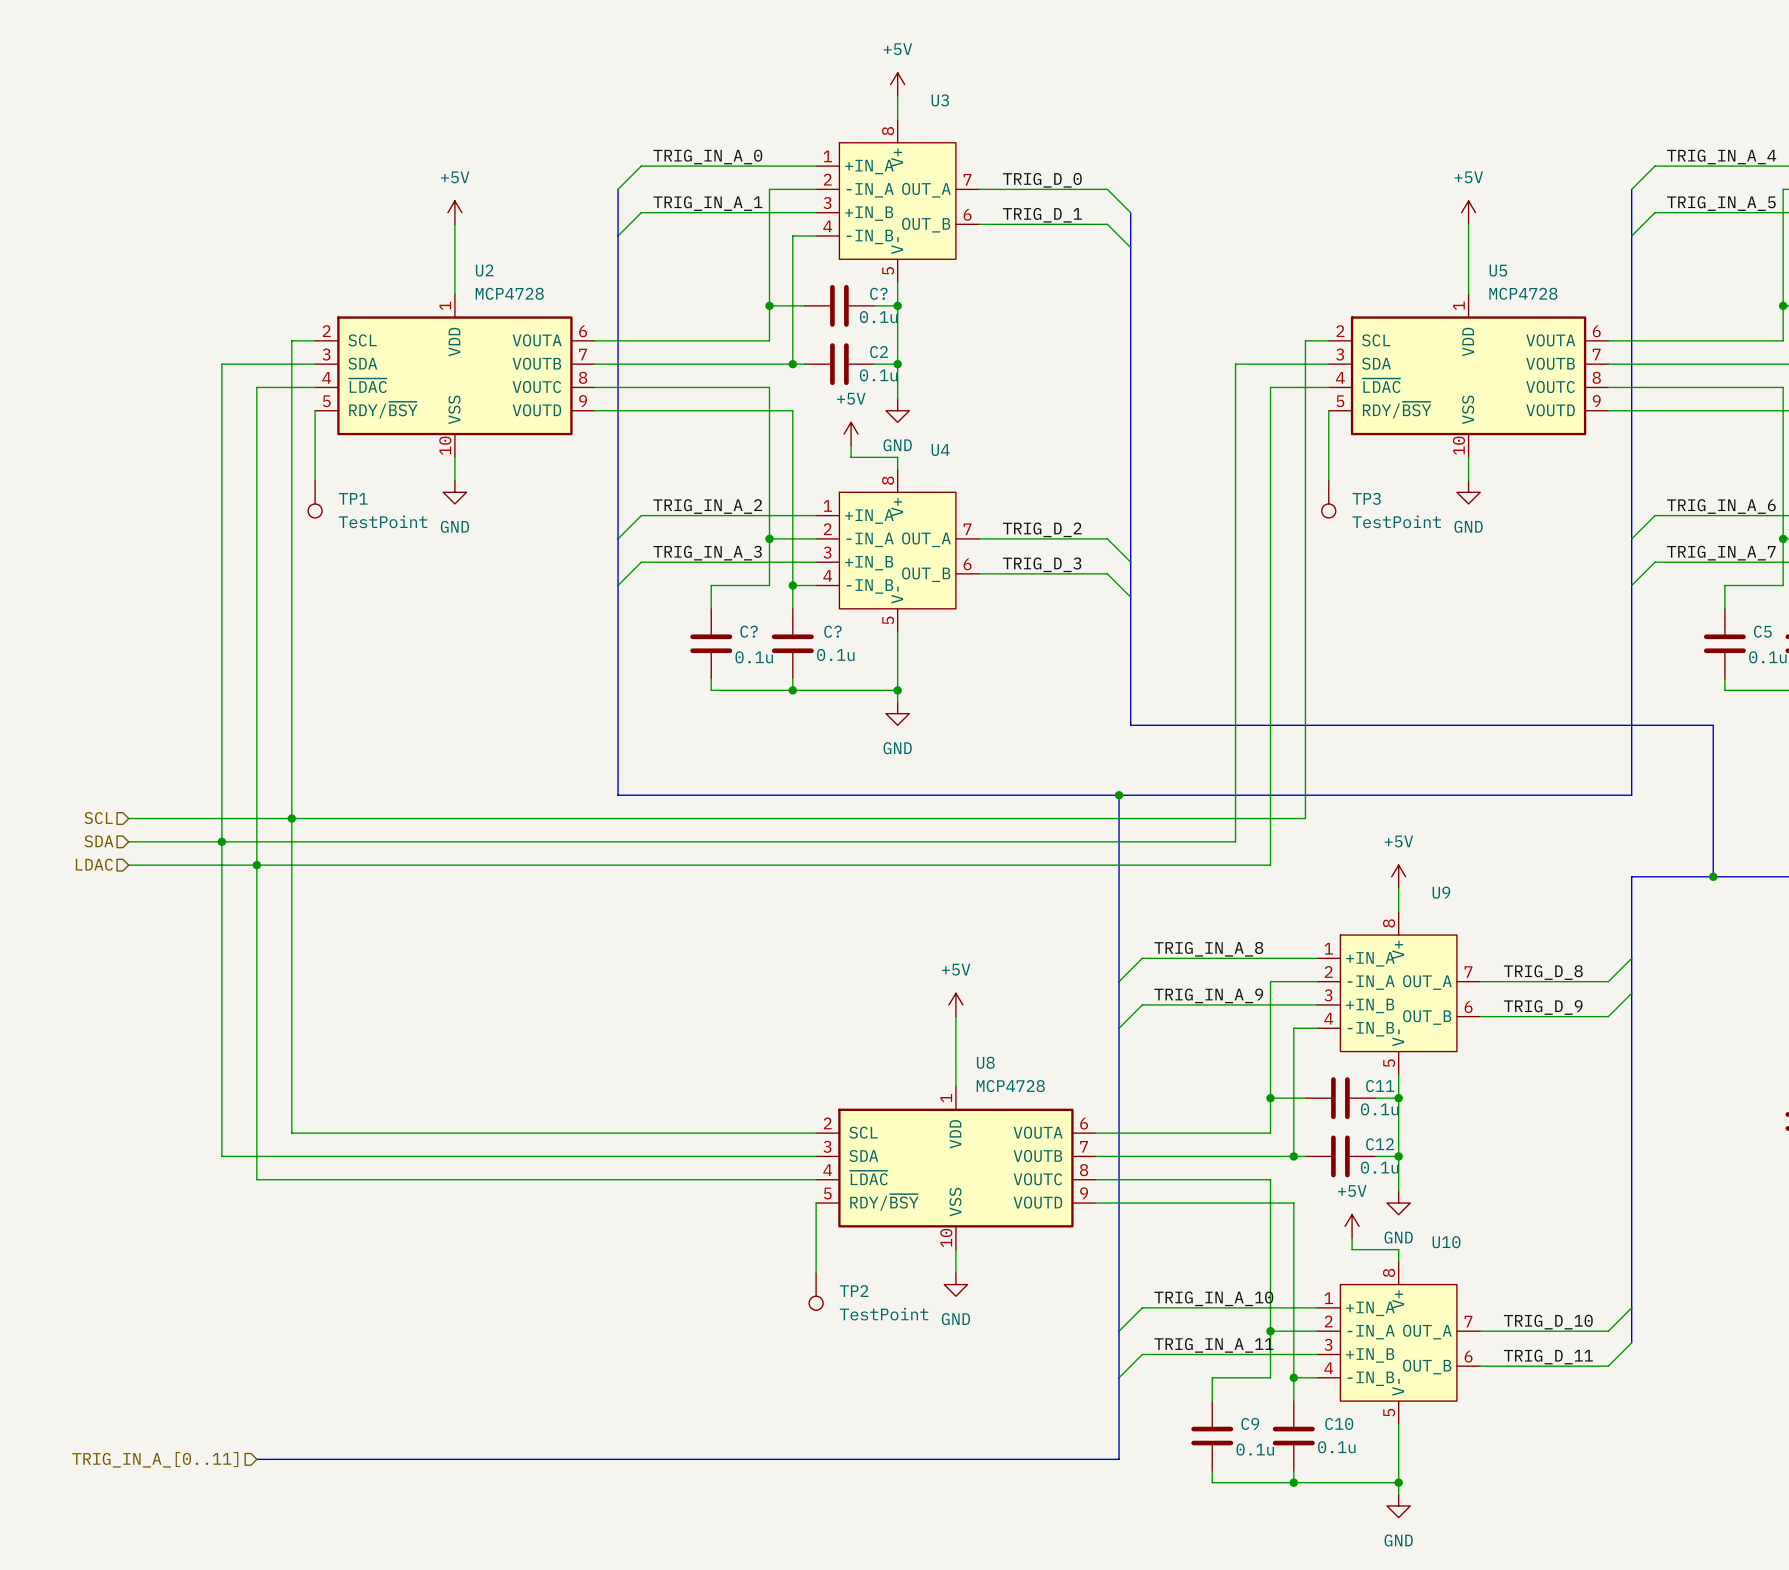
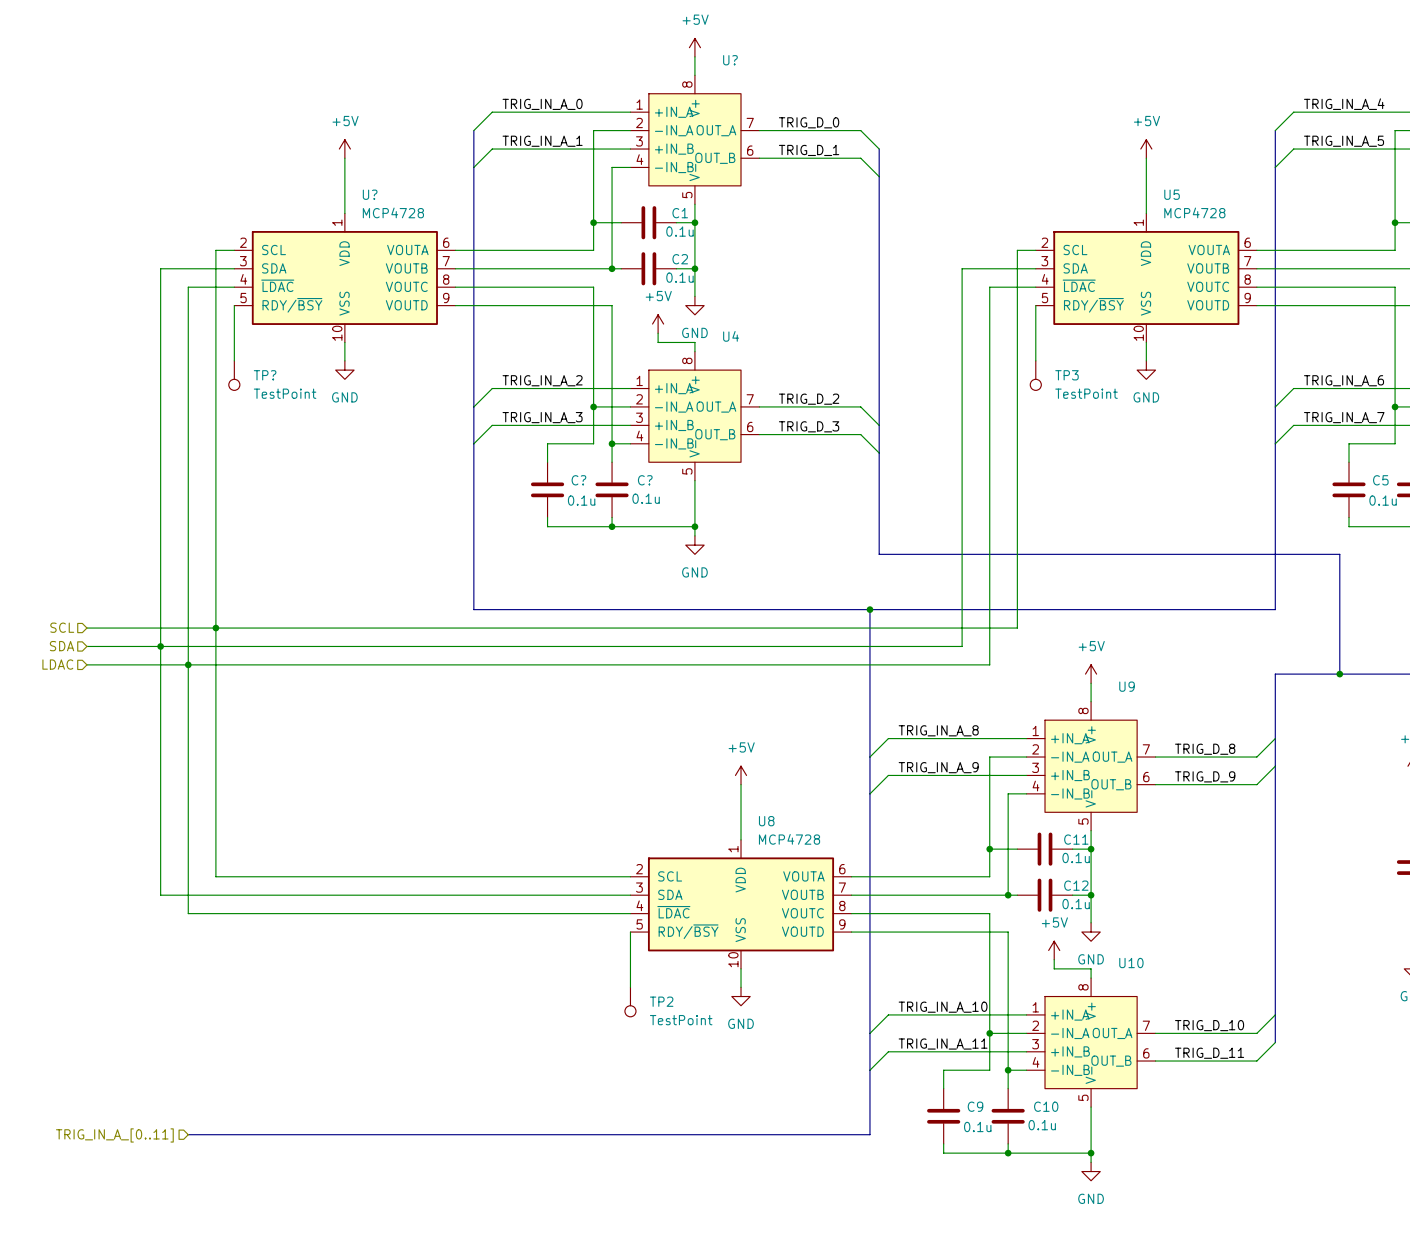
U3 name: U3 (940, 100) -> U? (730, 60)
U2 name: U2 (484, 270) -> U? (370, 194)
C? name: C? (878, 293) -> C1 (680, 213)
TP1 name: TP1 (353, 498) -> TP? (265, 375)

